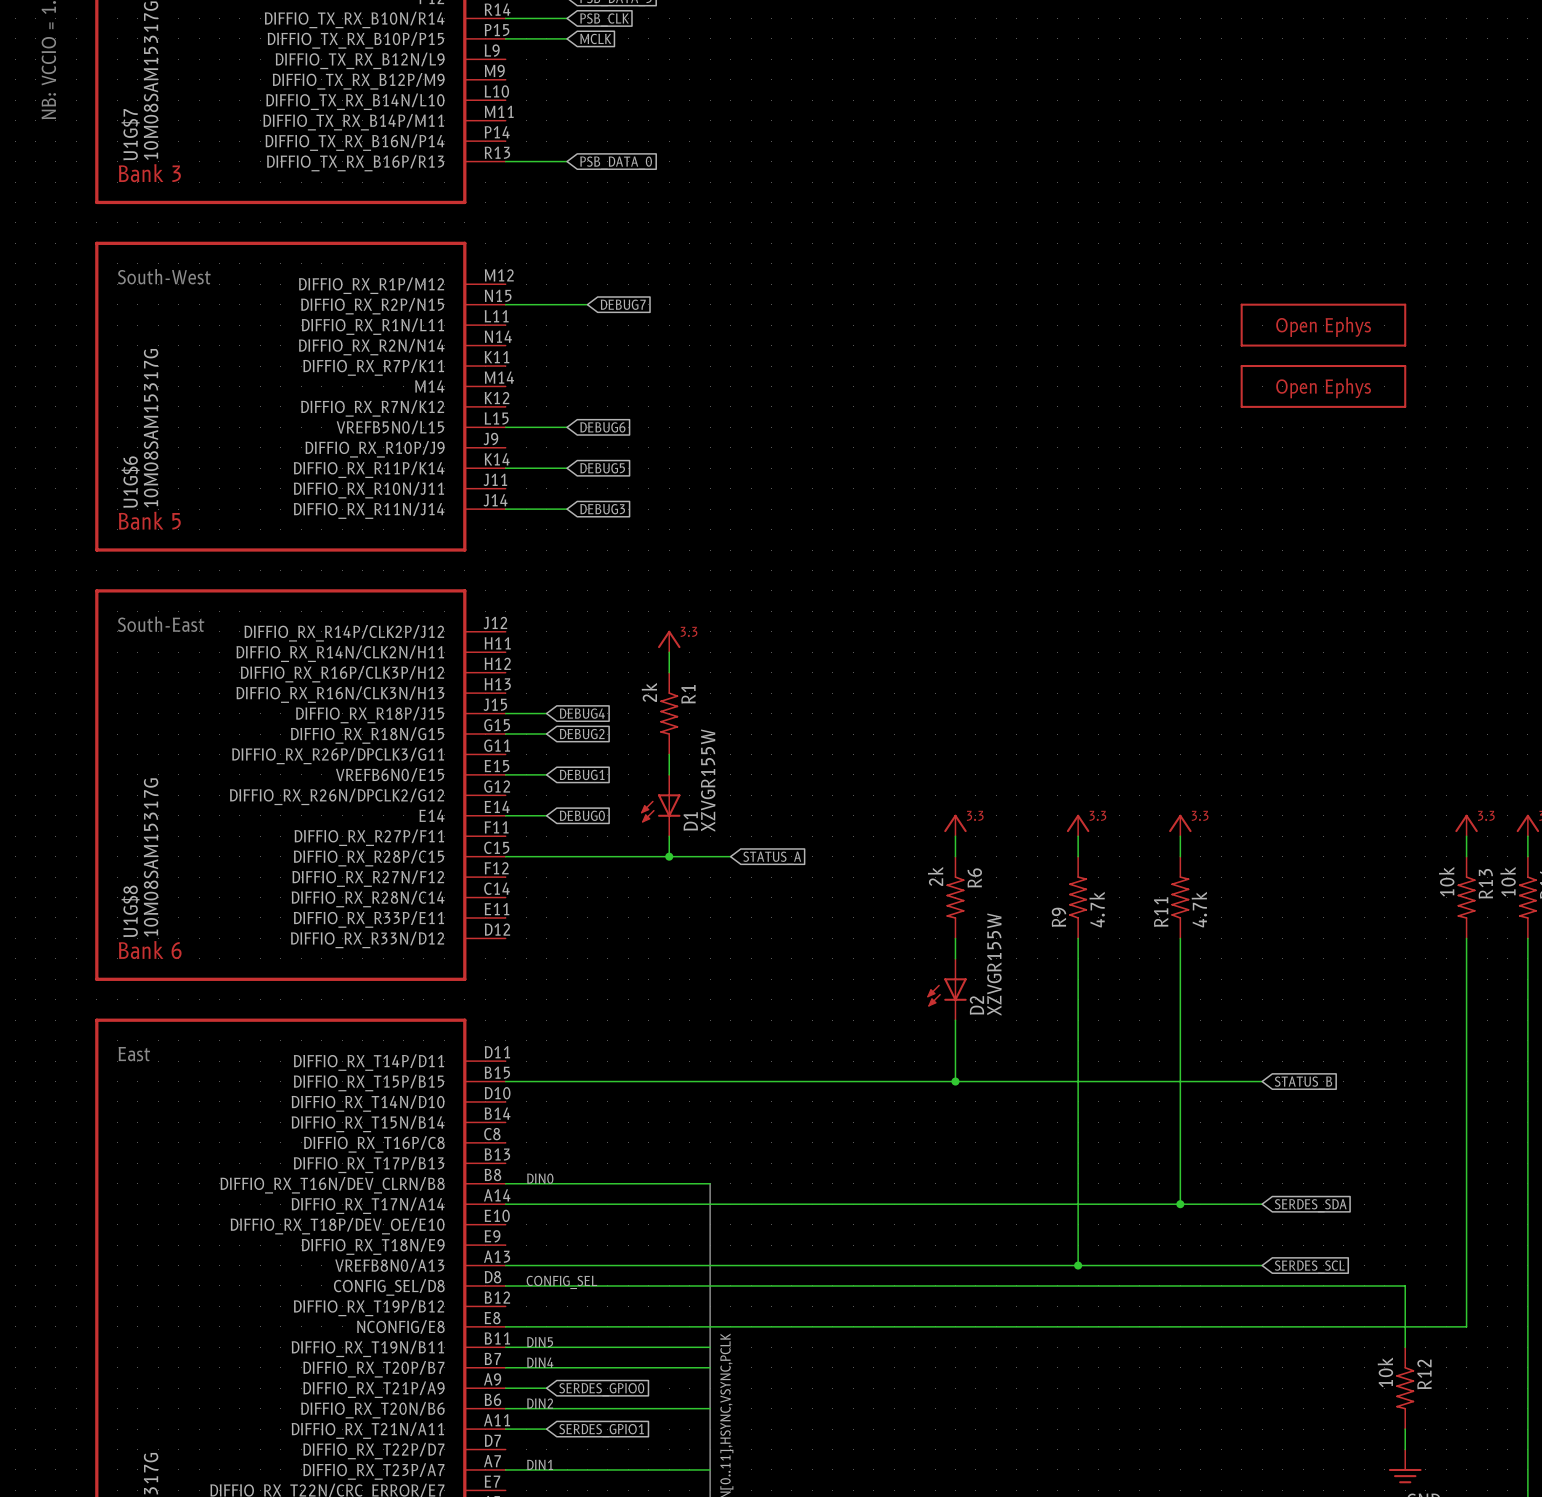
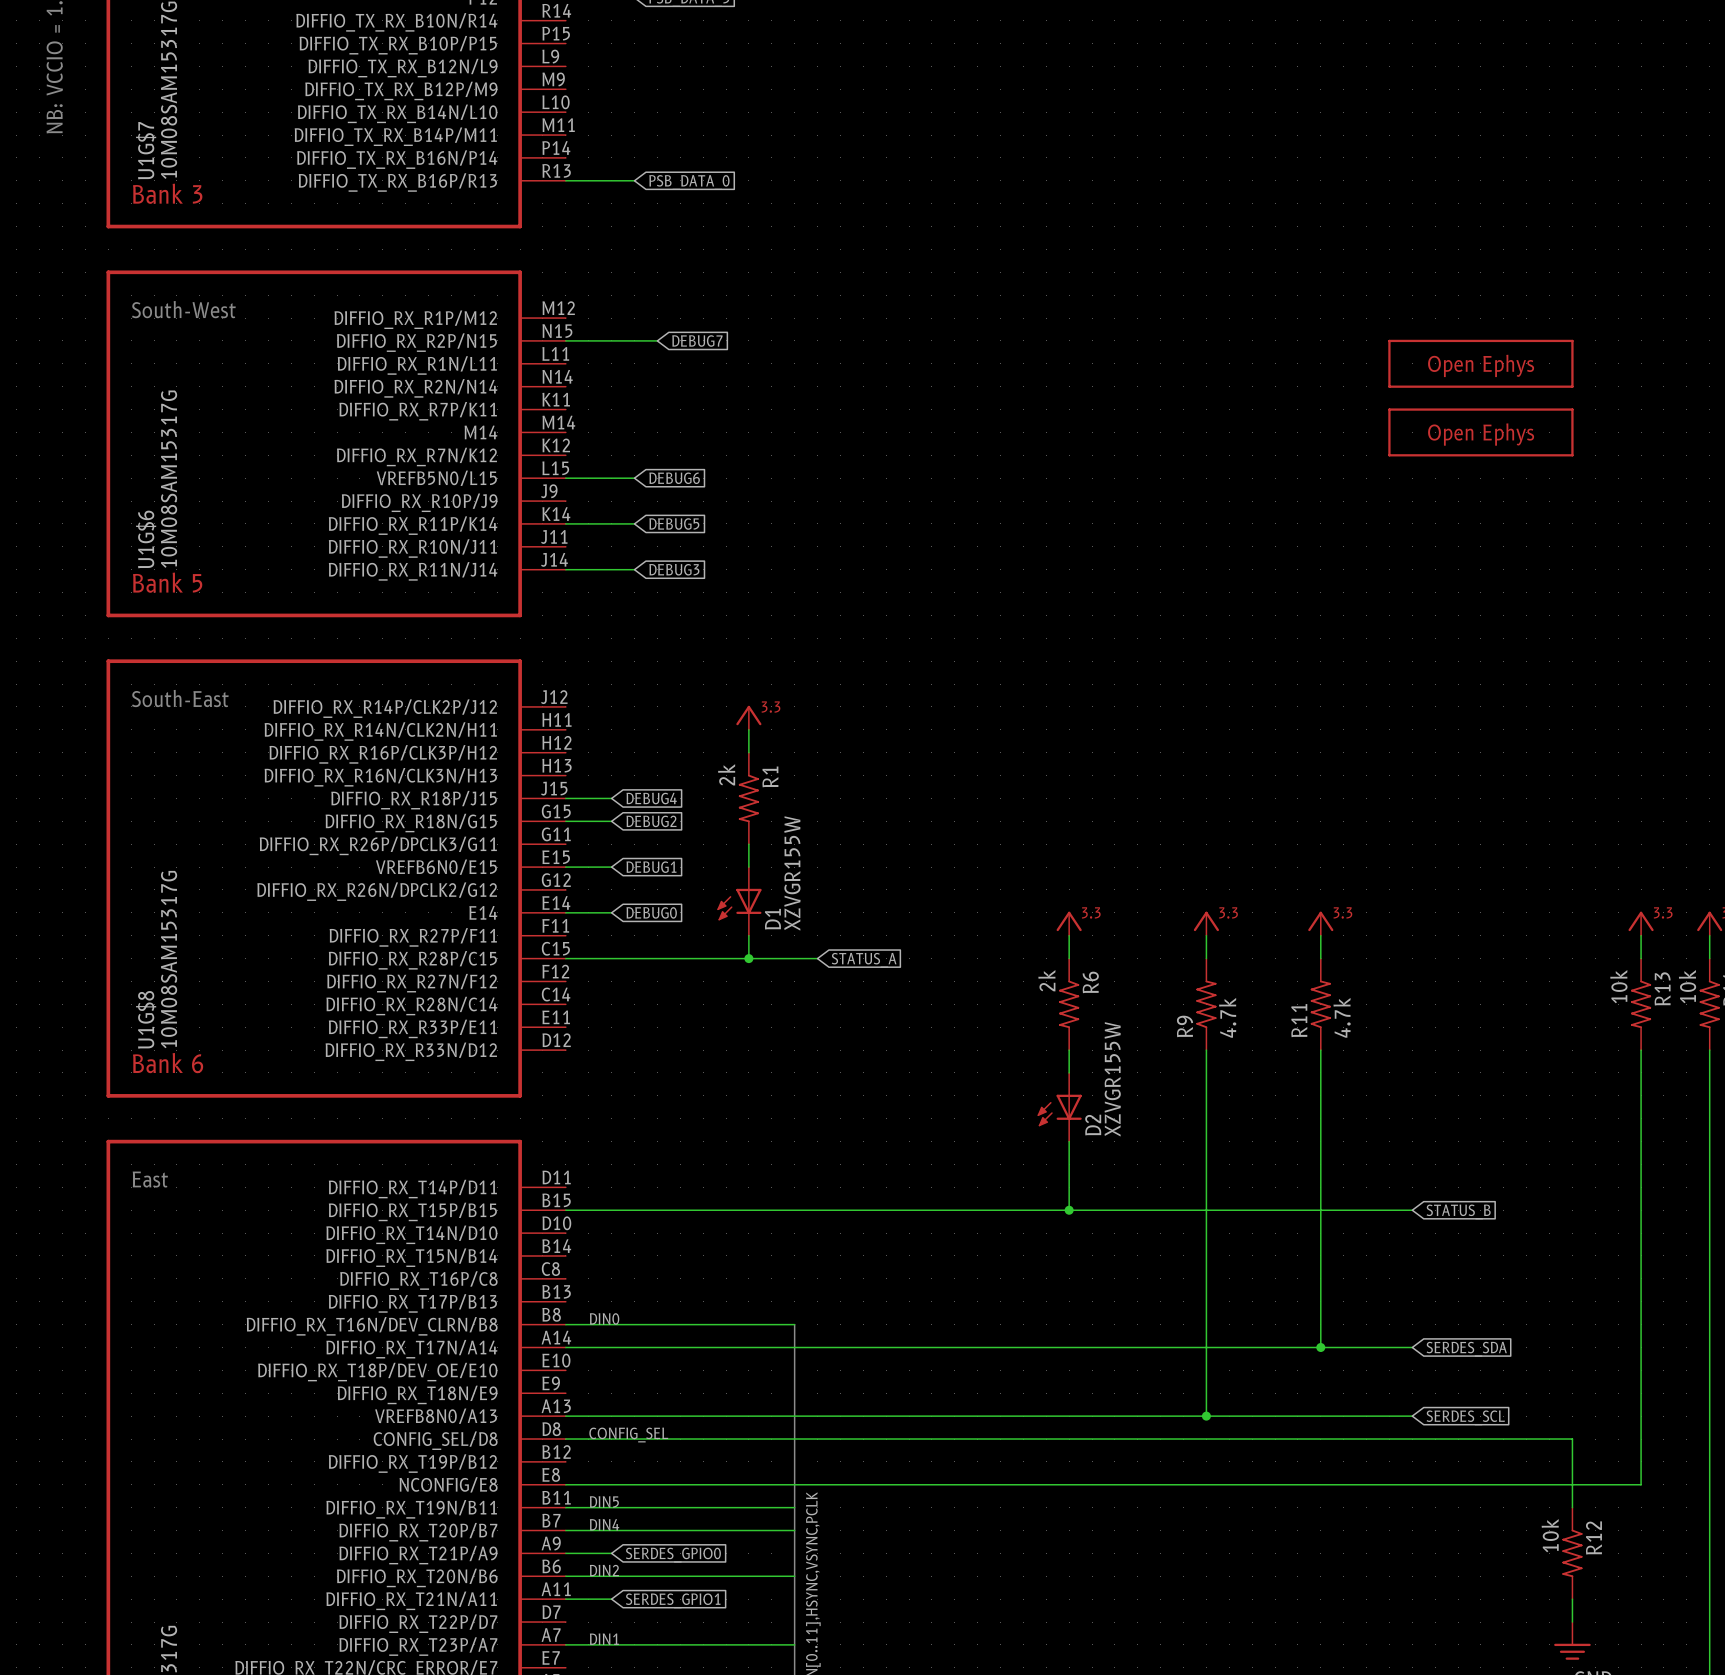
wire: (505, 18) (567, 18) -> none
global label: PSB_CLK (604, 19) -> none
wire: (505, 38) (567, 38) -> none
global label: MCLK (595, 38) -> none

